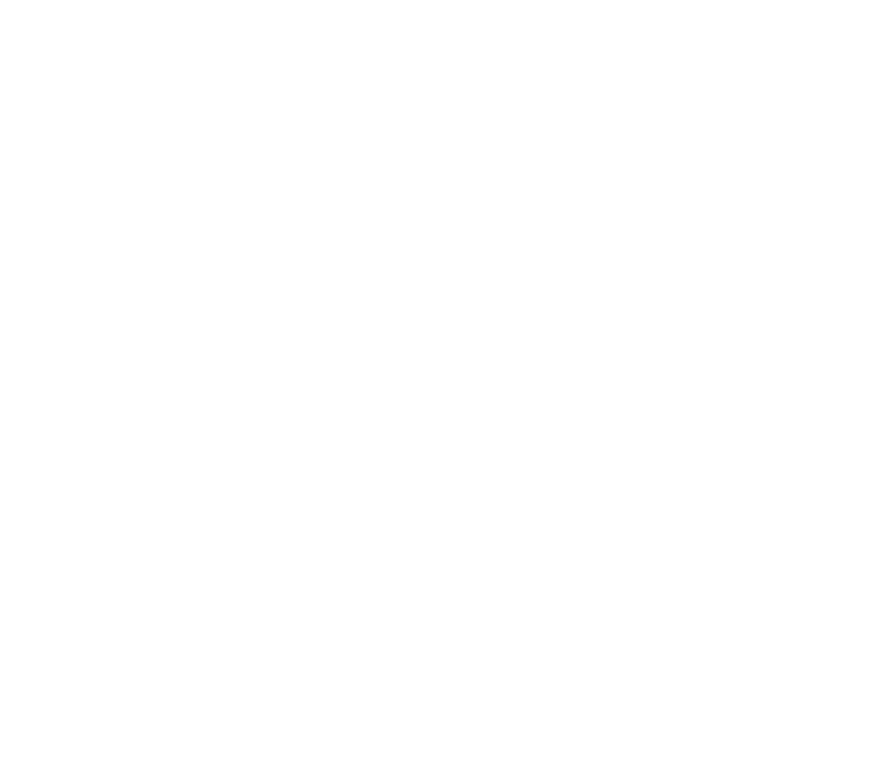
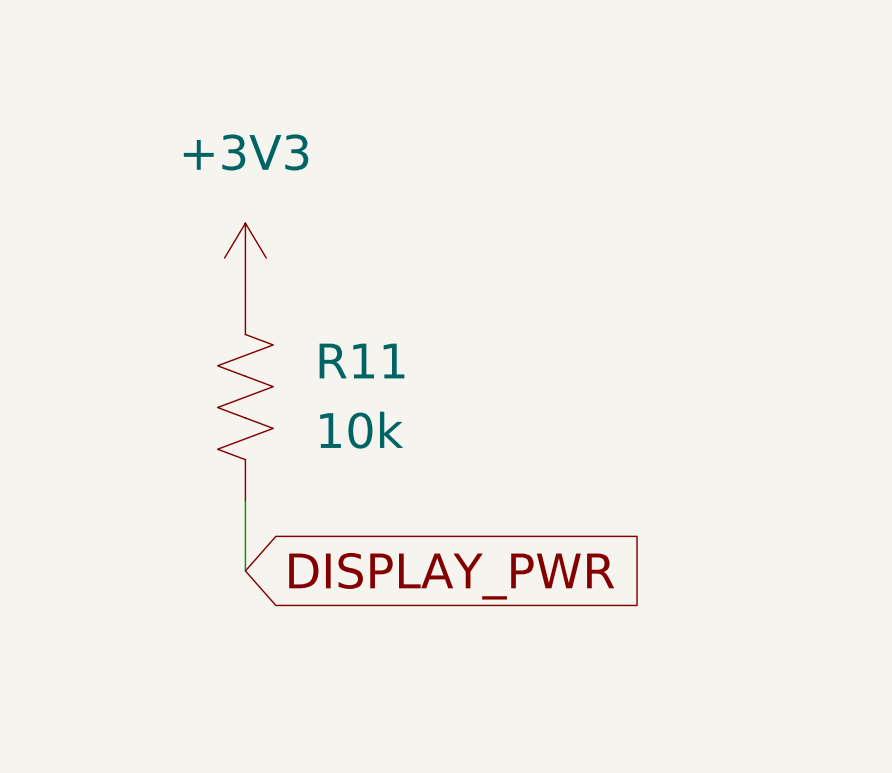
power symbol: none -> +3V3 (245, 258)
R11: none -> 10k (245, 397)
wire: none -> (245, 501) (245, 570)
global label: none -> DISPLAY_PWR (451, 576)

